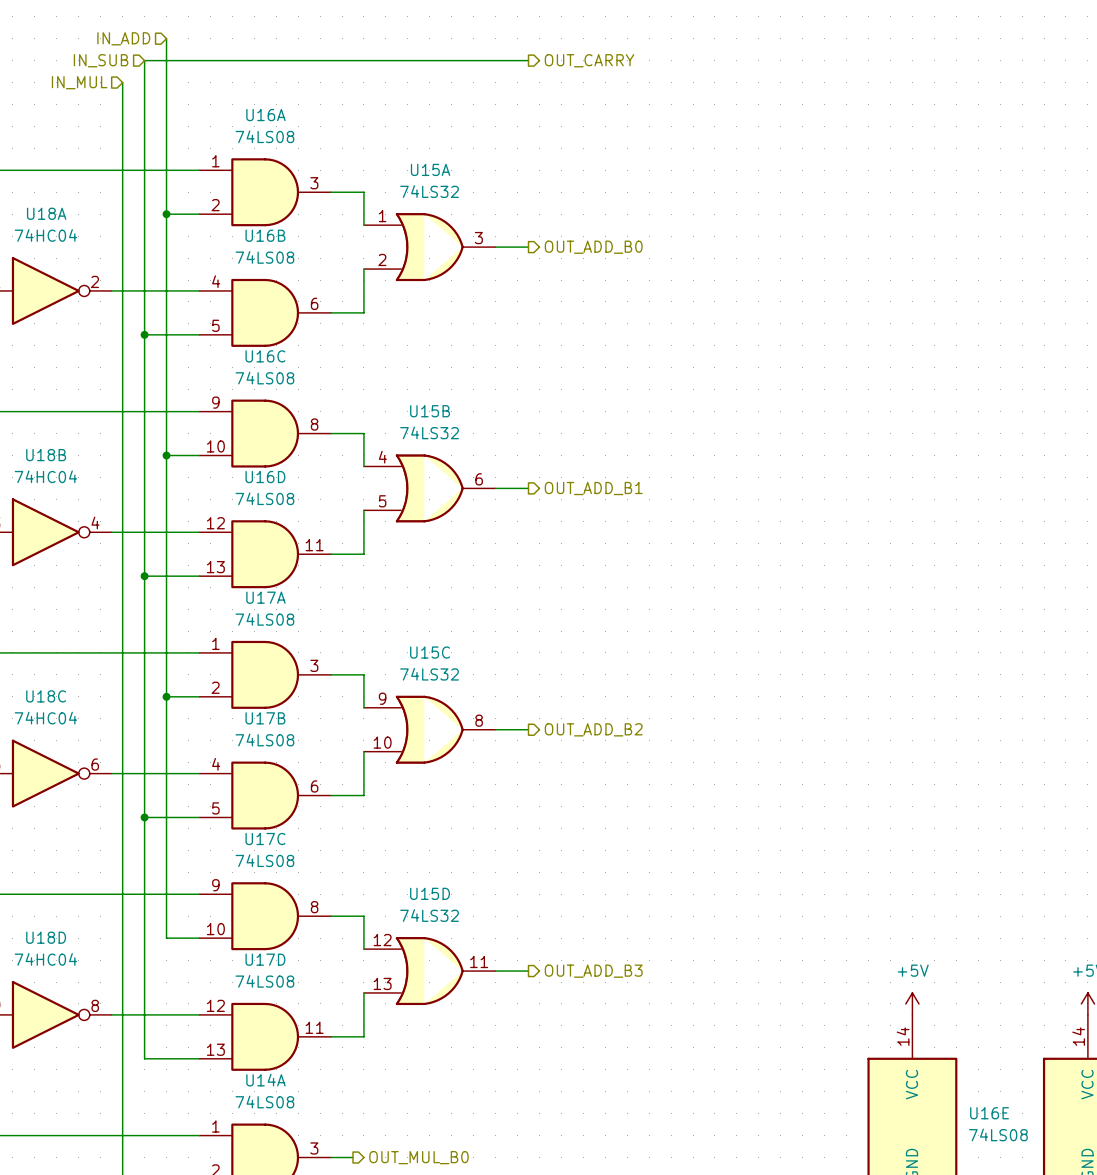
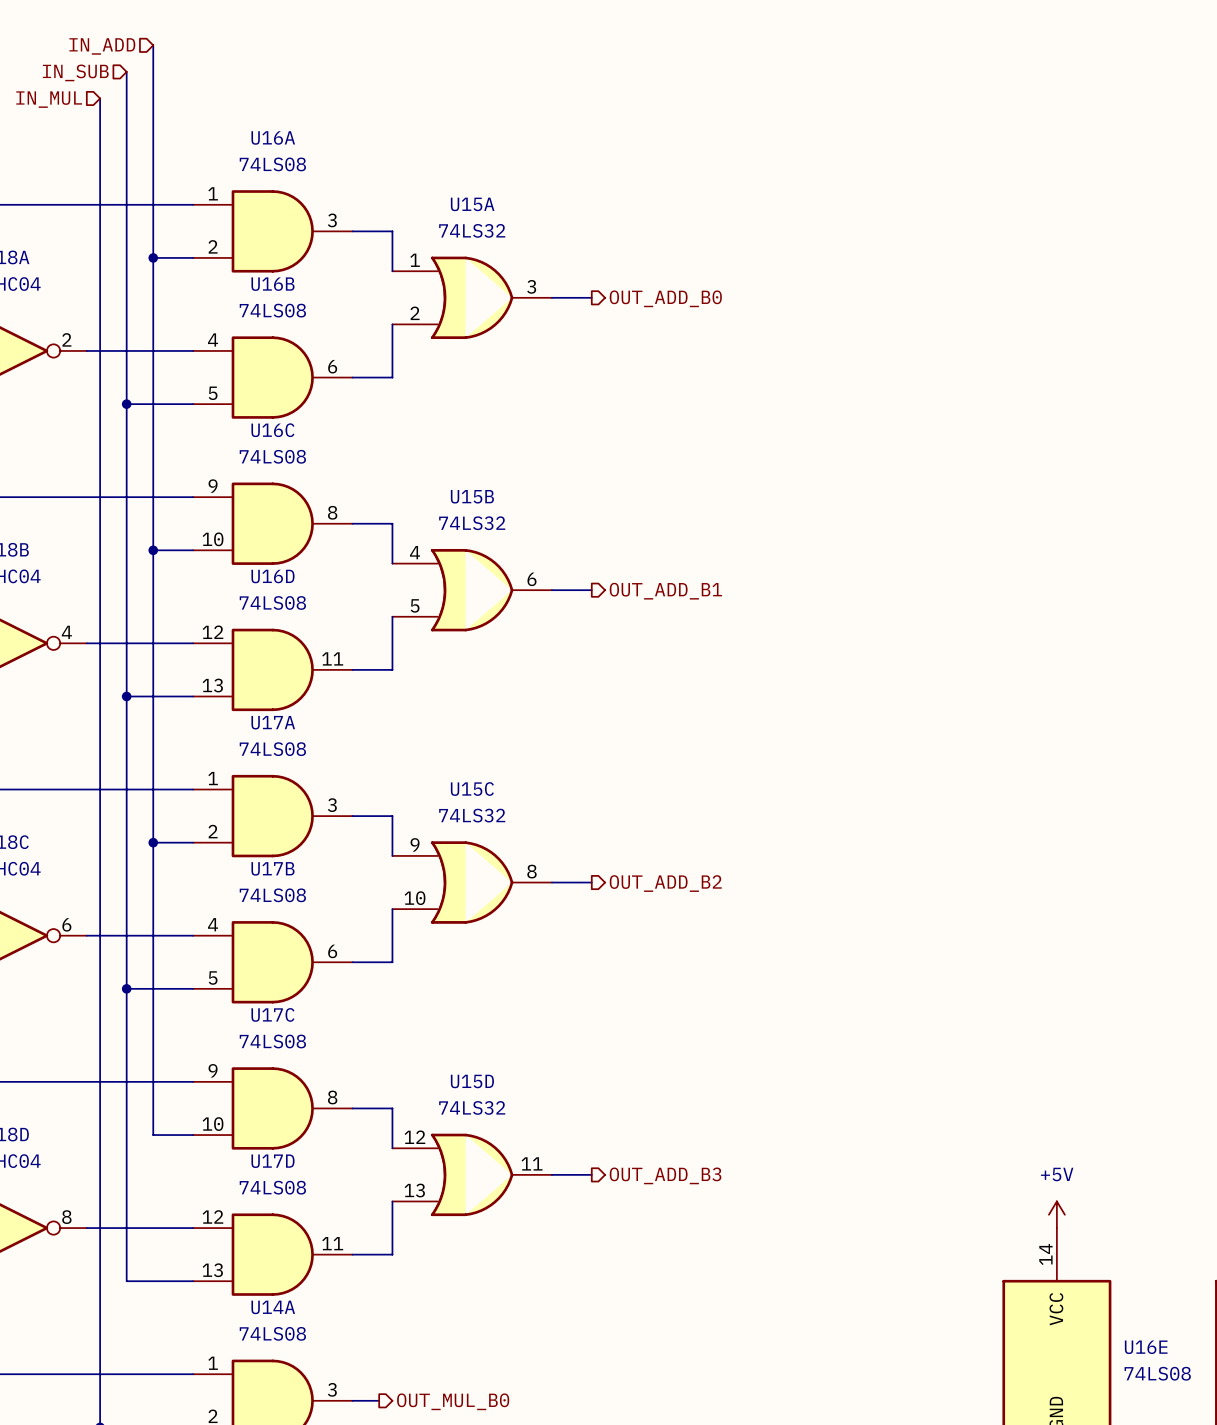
wire: (144, 60) (528, 60) -> none
hierarchical label: OUT_CARRY (589, 60) -> none

